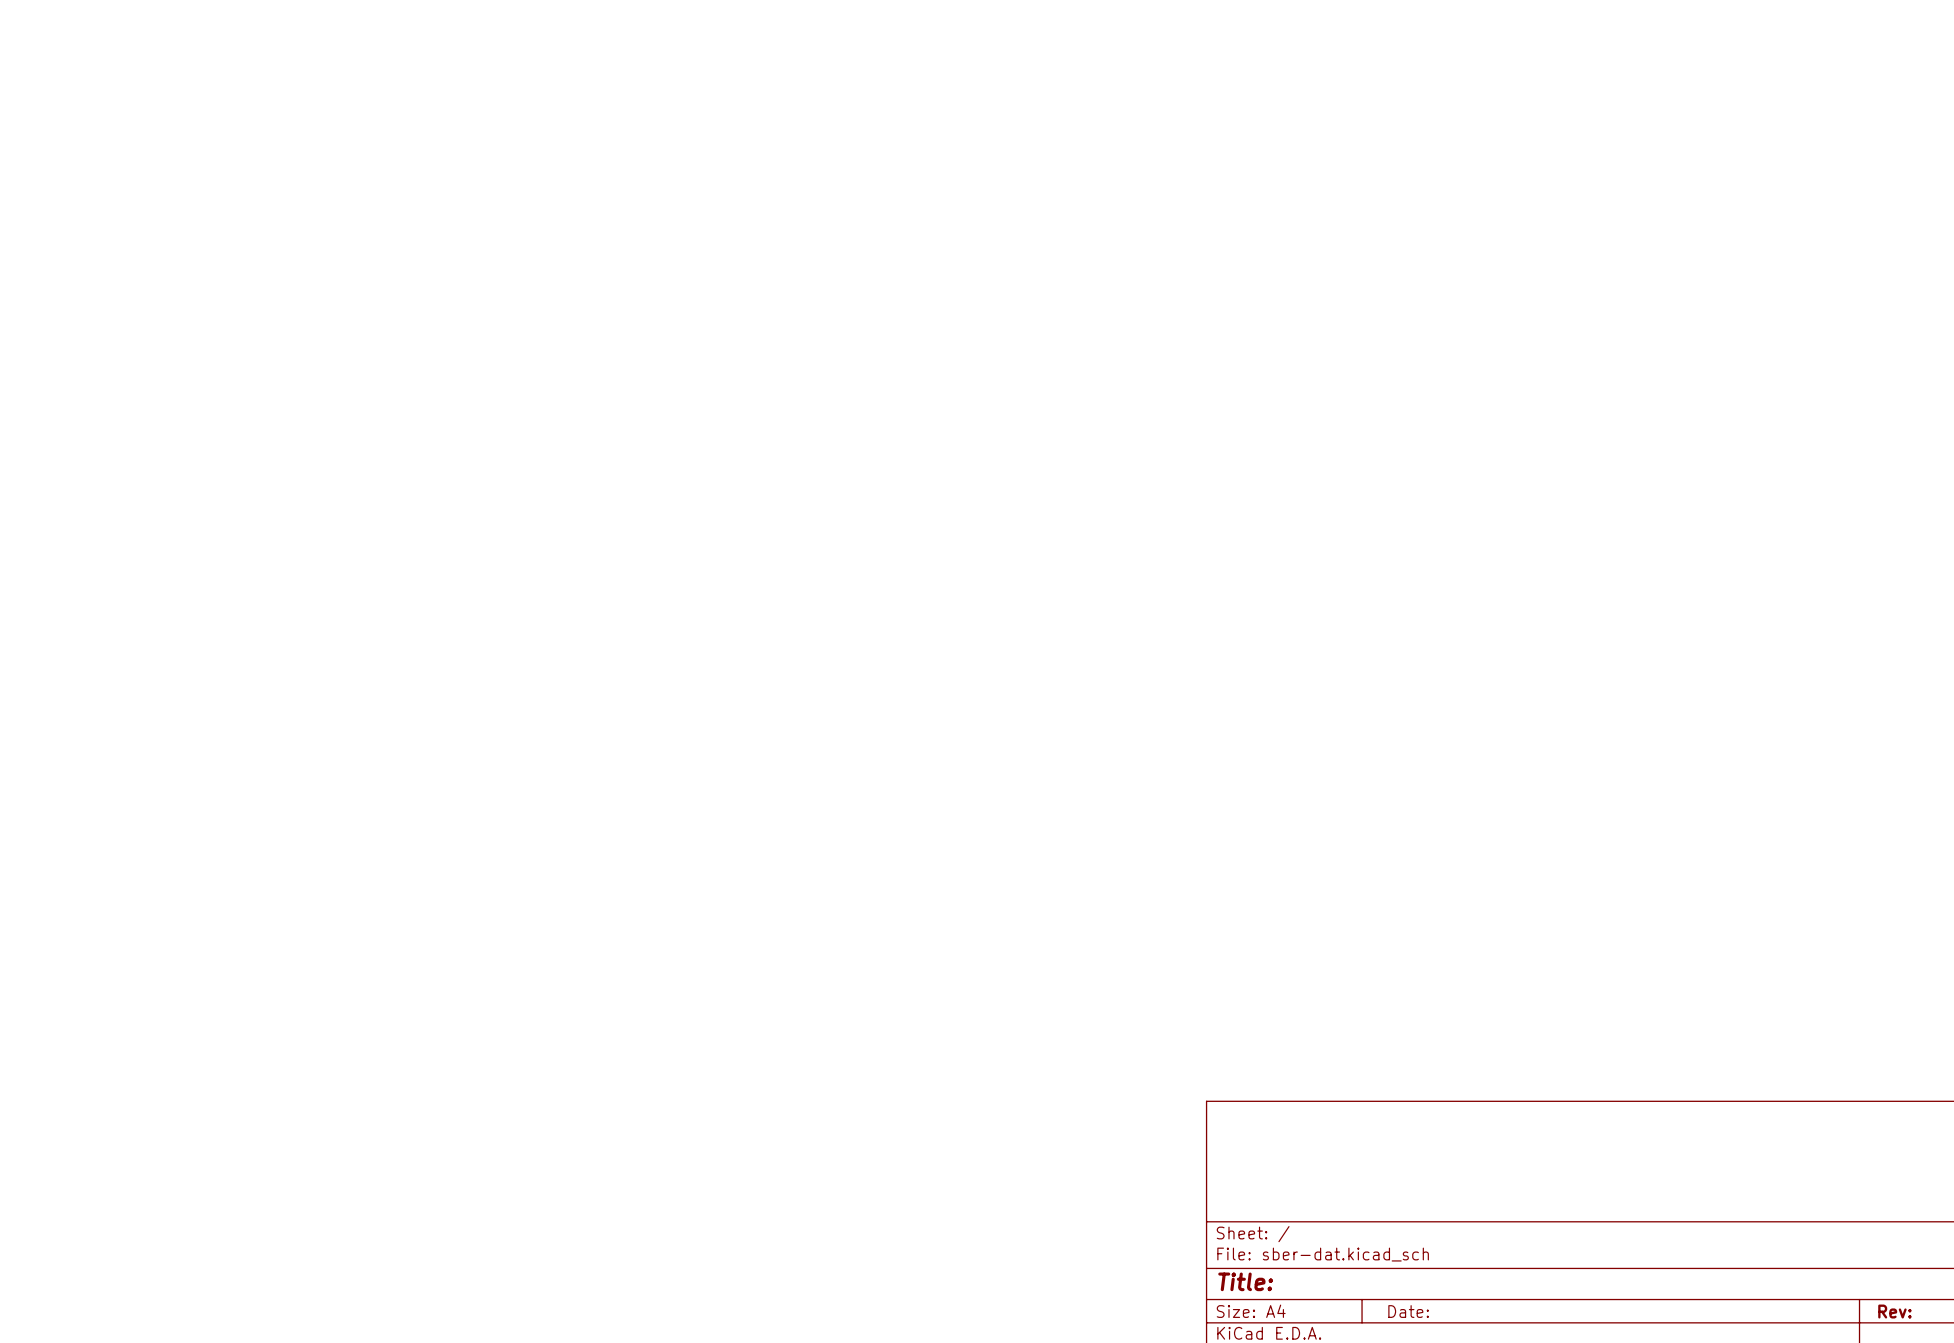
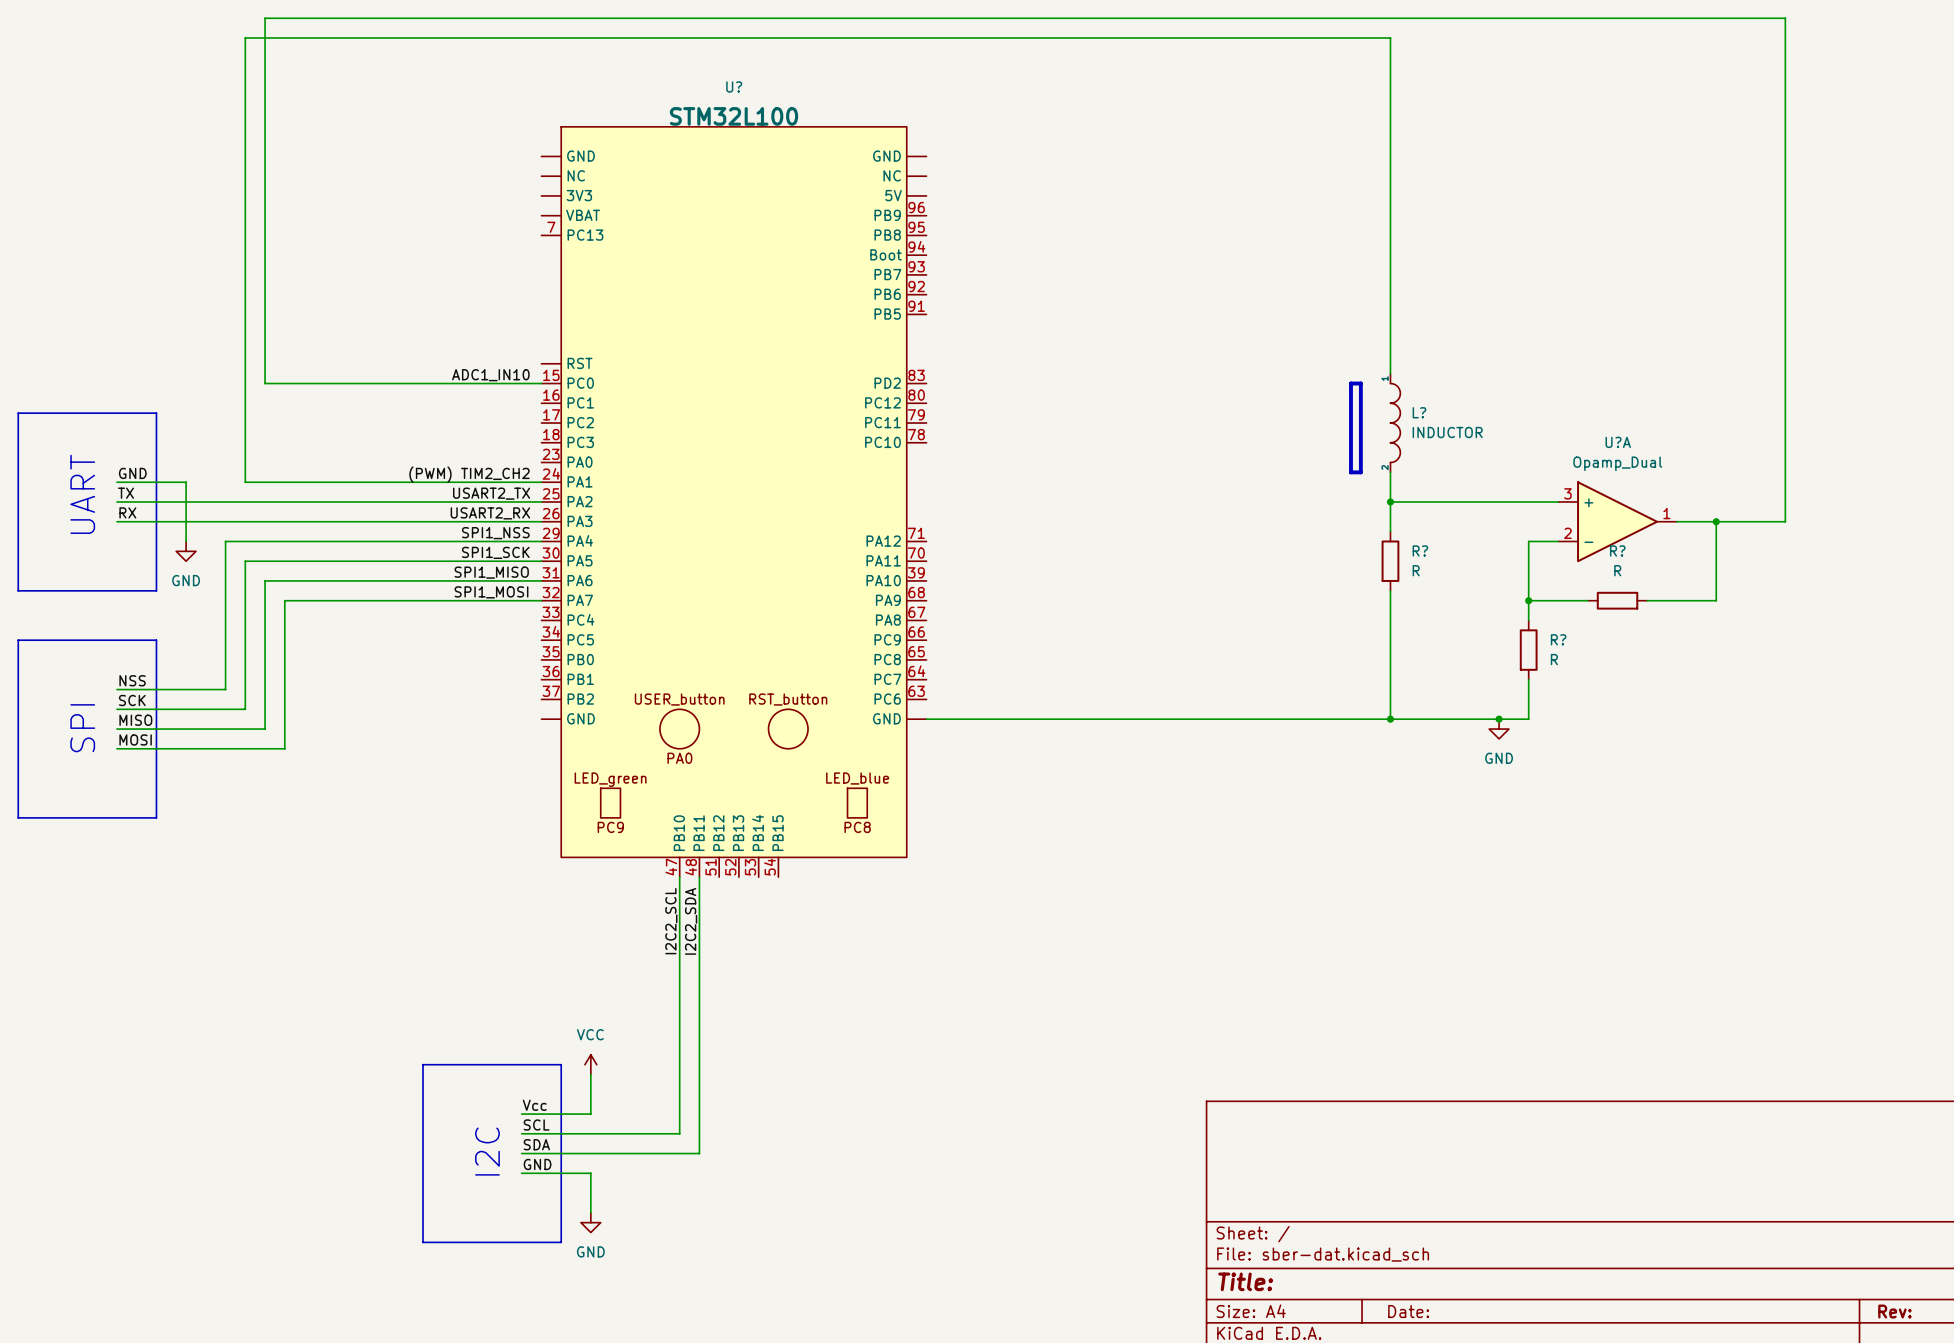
wire: none -> (1390, 373) (1390, 38) (245, 38) (245, 482) (541, 482)
label: none -> ADC1_IN10 (490, 375)
wire: none -> (541, 383) (265, 383) (265, 18) (1785, 18) (1785, 521) (1676, 521)
line: none -> (1350, 383) (1360, 383) (1360, 472) (1350, 472) (1350, 383)
line: none -> (18, 413) (156, 413) (156, 590) (18, 590) (18, 413)
L?: none -> INDUCTOR (1395, 423)
wire: none -> (1390, 472) (1390, 531)
label: none -> GND (132, 473)
label: none -> (PWM) TIM2_CH2 (469, 474)
wire: none -> (116, 482) (186, 482) (186, 541)
label: none -> TX (125, 493)
label: none -> USART2_TX (491, 493)
text: none -> UART (82, 494)
wire: none -> (116, 501) (541, 501)
U?: none -> STM32L100 (733, 501)
wire: none -> (1390, 501) (1558, 501)
junction: none -> (1390, 501)
label: none -> RX (127, 512)
label: none -> USART2_RX (490, 513)
wire: none -> (116, 521) (541, 521)
U?A: none -> Opamp_Dual (1617, 521)
wire: none -> (1716, 521) (1716, 600) (1647, 600)
junction: none -> (1716, 521)
label: none -> SPI1_NSS (495, 533)
wire: none -> (541, 541) (225, 541) (225, 689) (116, 689)
wire: none -> (1558, 541) (1528, 541) (1528, 620)
power symbol: none -> GND (186, 551)
label: none -> SPI1_SCK (495, 552)
wire: none -> (541, 561) (245, 561) (245, 709) (116, 709)
R?: none -> R (1390, 561)
label: none -> SPI1_MISO (491, 572)
wire: none -> (541, 580) (265, 580) (265, 729) (116, 729)
wire: none -> (1390, 590) (1390, 719)
label: none -> SPI1_MOSI (491, 592)
wire: none -> (541, 600) (284, 600) (284, 748) (116, 748)
wire: none -> (1528, 600) (1587, 600)
junction: none -> (1528, 600)
R?: none -> R (1617, 600)
line: none -> (18, 640) (18, 817) (156, 817) (156, 640) (18, 640)
R?: none -> R (1528, 650)
wire: none -> (1528, 679) (1528, 719) (926, 719)
label: none -> NSS (132, 680)
label: none -> SCK (132, 700)
junction: none -> (1390, 719)
junction: none -> (1499, 719)
label: none -> MISO (135, 720)
text: none -> SPI (82, 728)
power symbol: none -> GND (1499, 729)
label: none -> MOSI (135, 739)
wire: none -> (679, 877) (679, 1133) (521, 1133)
wire: none -> (699, 877) (699, 1153) (521, 1153)
label: none -> I2C2_SCL (671, 921)
label: none -> I2C2_SDA (691, 921)
line: none -> (423, 1064) (561, 1064) (561, 1242) (423, 1242) (423, 1064)
power symbol: none -> VCC (590, 1064)
wire: none -> (590, 1074) (590, 1114) (521, 1114)
label: none -> Vcc (534, 1105)
label: none -> SCL (536, 1124)
label: none -> SDA (536, 1144)
text: none -> I2C (487, 1151)
label: none -> GND (537, 1164)
wire: none -> (521, 1173) (590, 1173) (590, 1212)
power symbol: none -> GND (590, 1222)

